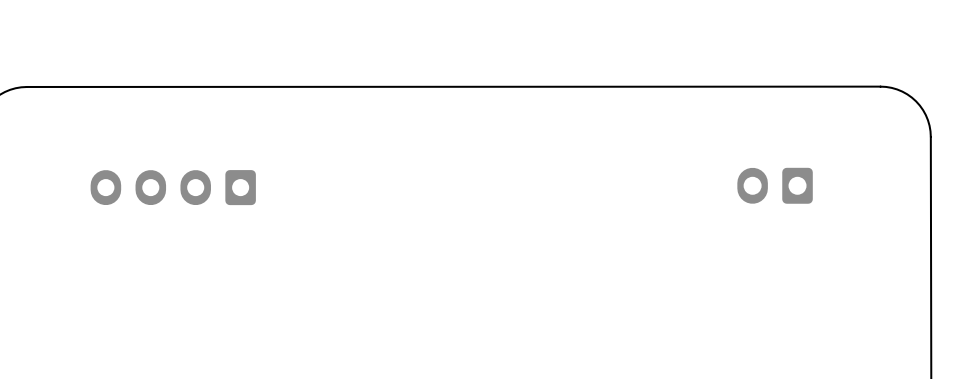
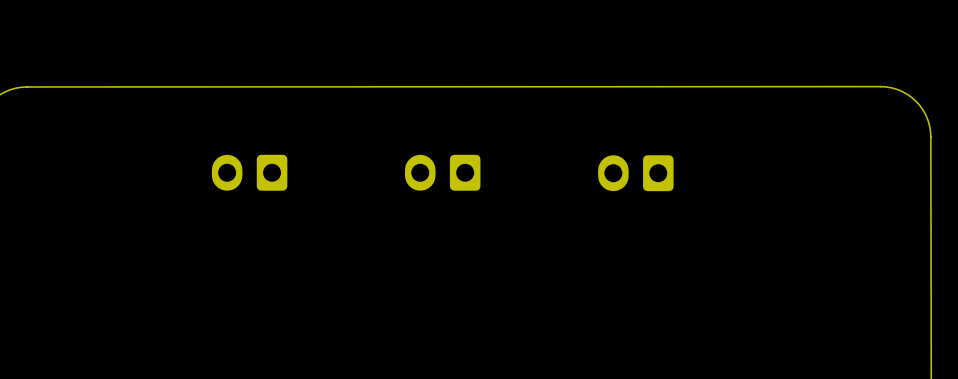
part: none -> (249, 172)
part: none -> (442, 172)
part position: (775, 185) -> (635, 173)
part: (173, 187) -> none

